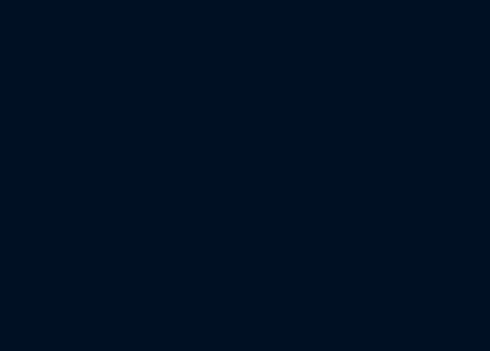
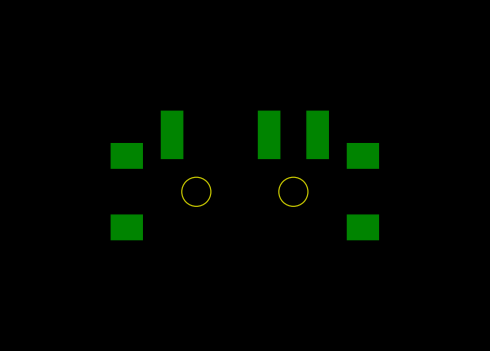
part: none -> (244, 175)

